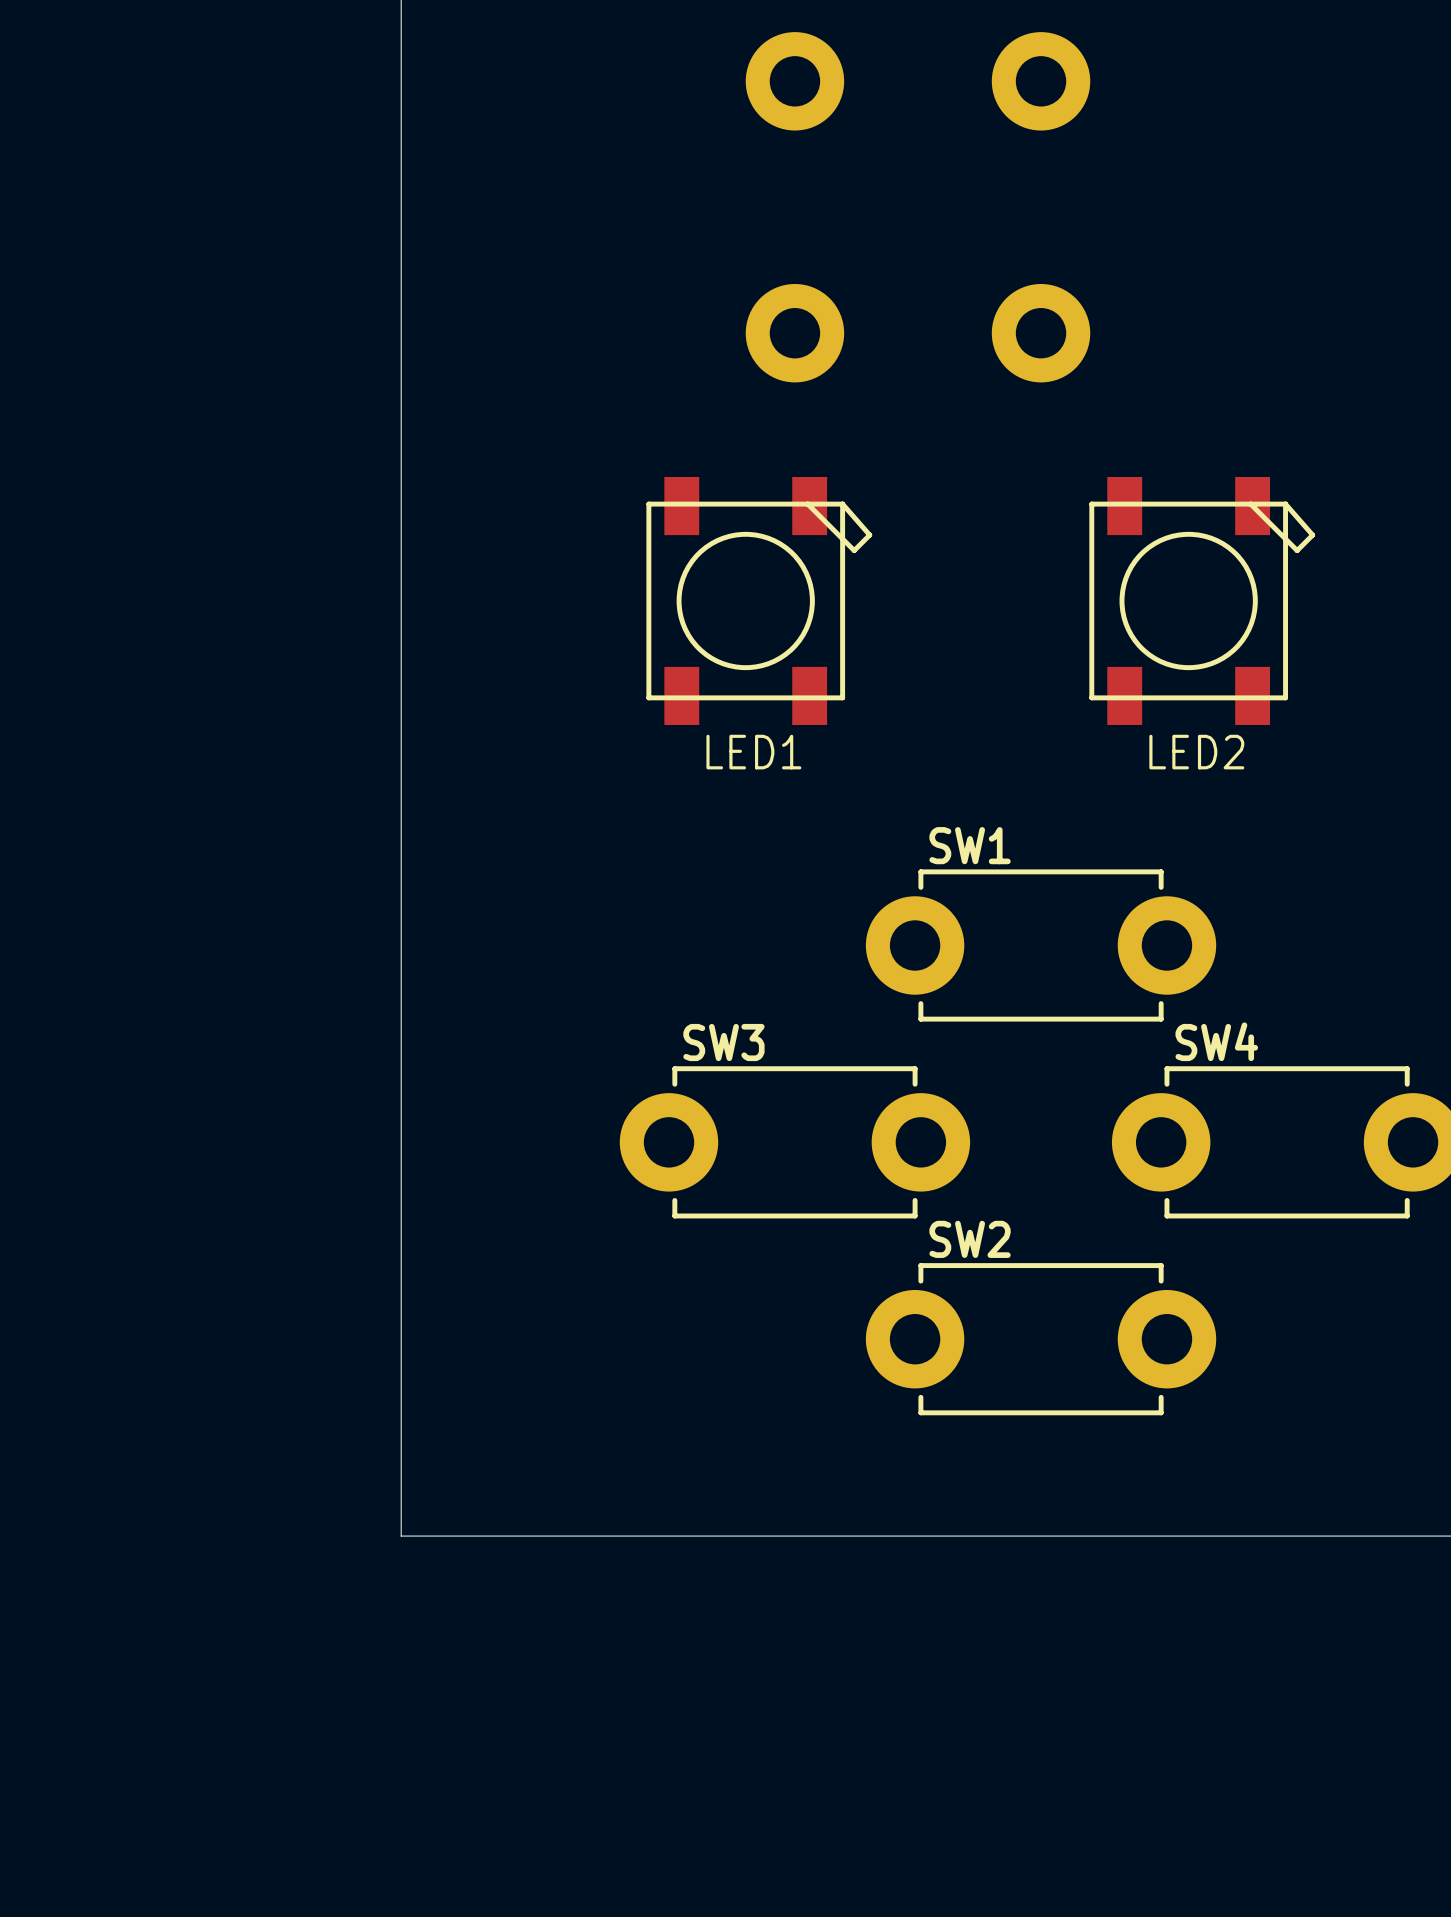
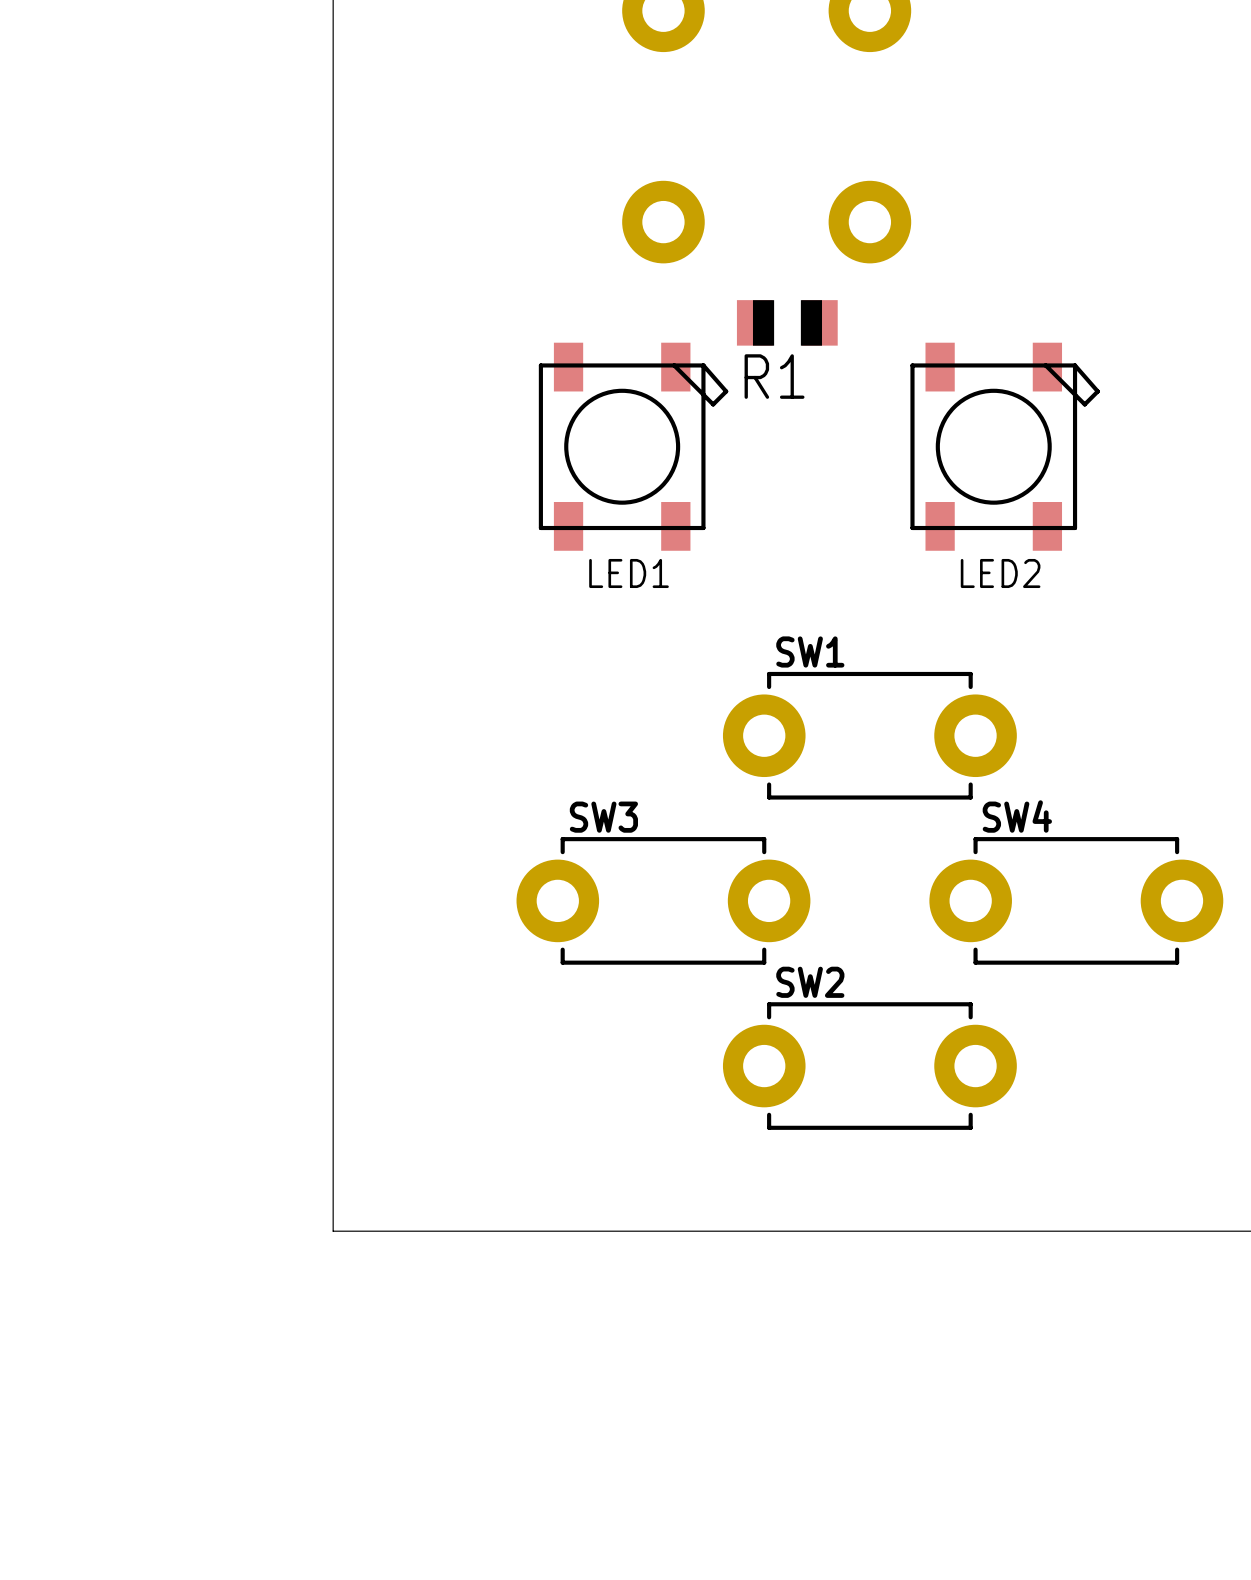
R1: none -> (787, 322)

